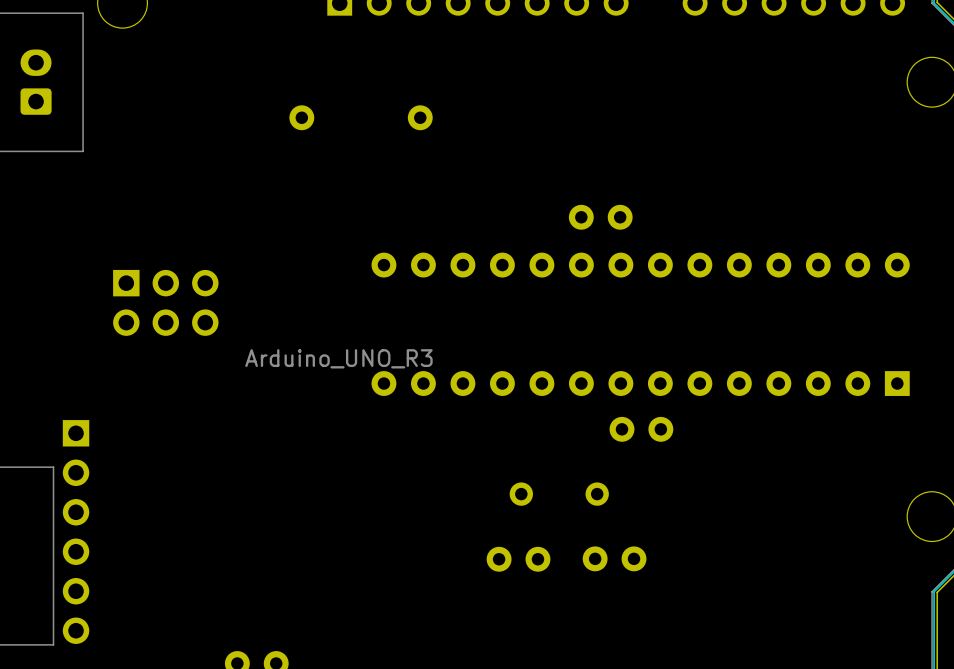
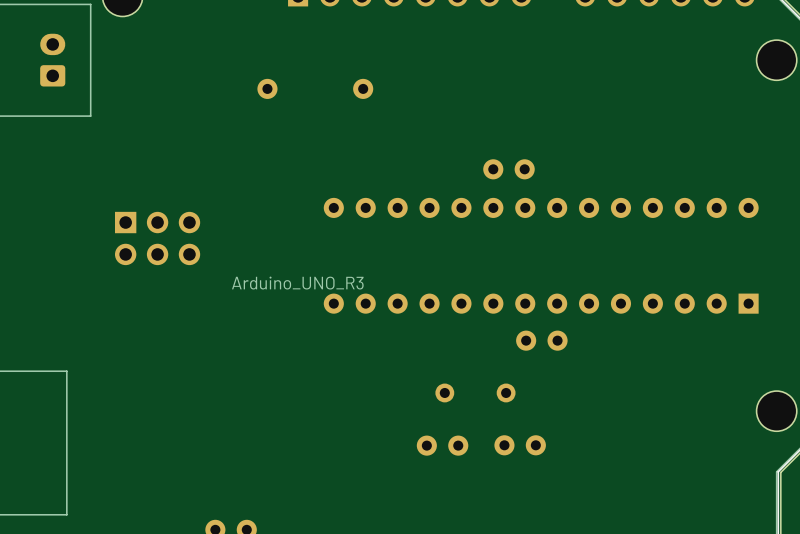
part: (76, 532) -> none

